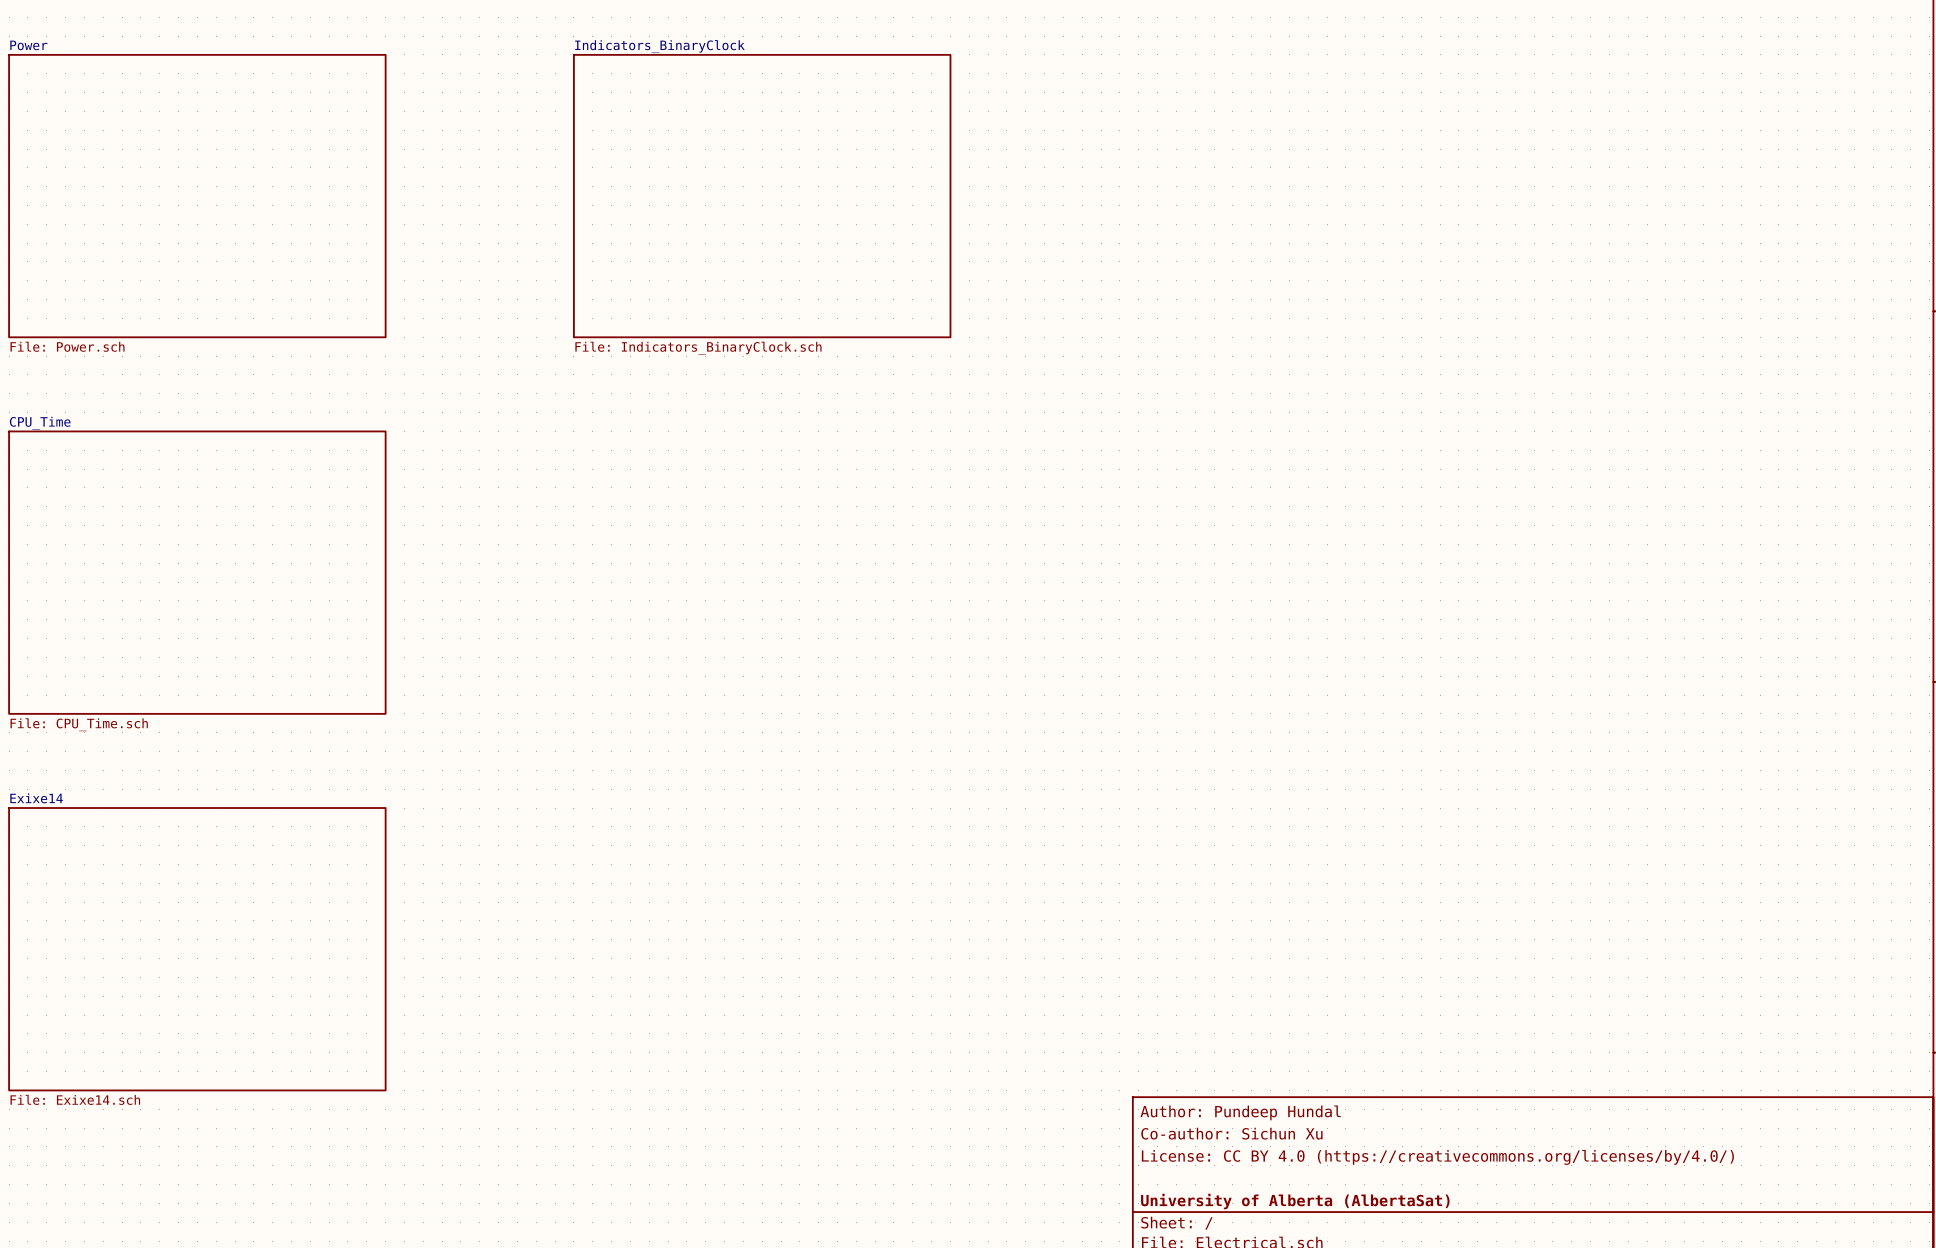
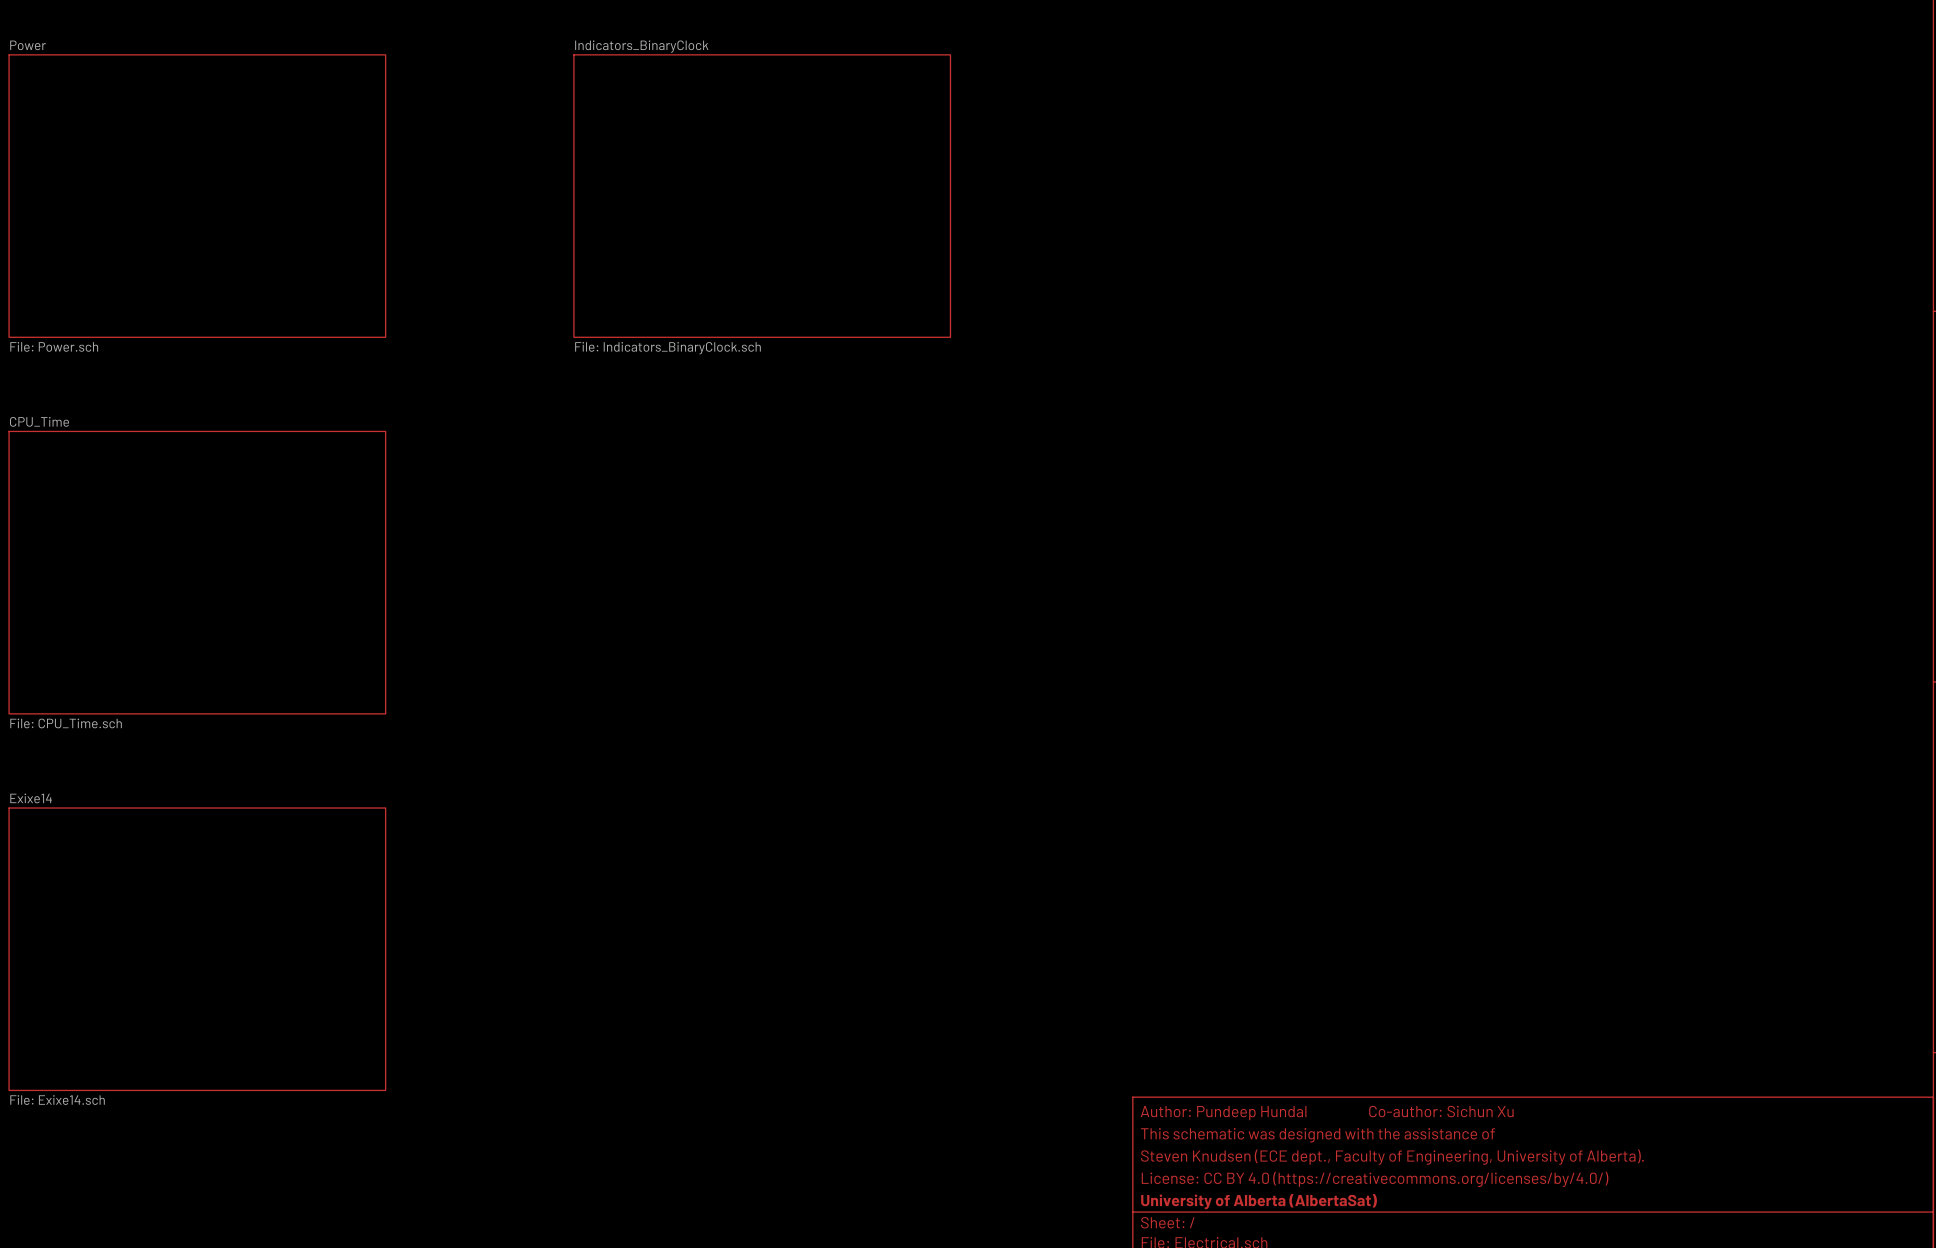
title block: Author: Pundeep Hundal (1240, 1112) -> Author: Pundeep Hundal Co-author: Sichun Xu (1327, 1113)
title block: Co-author: Sichun Xu (1231, 1133) -> This schematic was designed with the assistance of (1317, 1135)
title block: License: CC BY 4.0 (https://creativecommons.org/licenses/by/4.0/) (1437, 1157) -> Steven Knudsen (ECE dept., Faculty of Engineering, University of Alberta). (1392, 1157)
title block: none -> License: CC BY 4.0 (https://creativecommons.org/licenses/by/4.0/) (1375, 1179)

